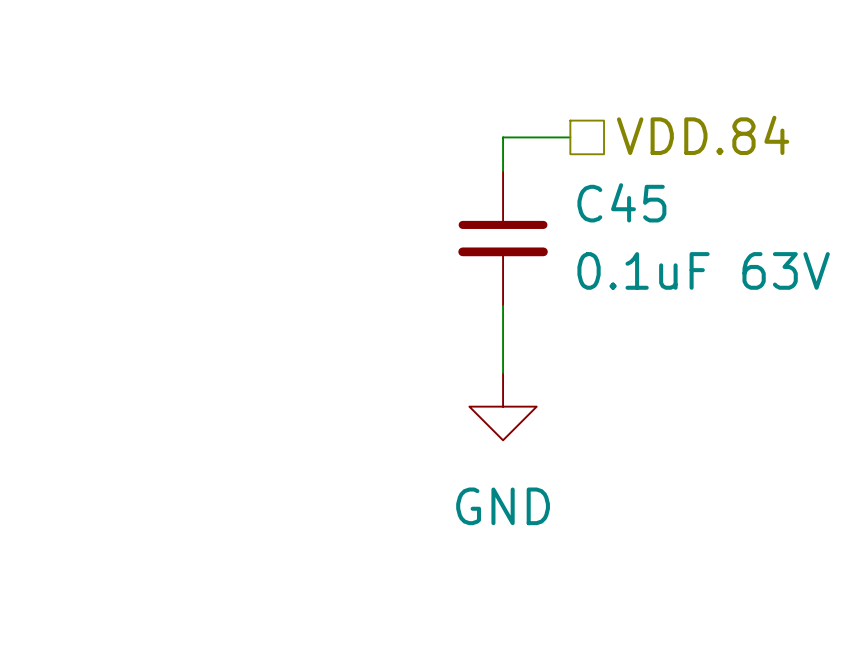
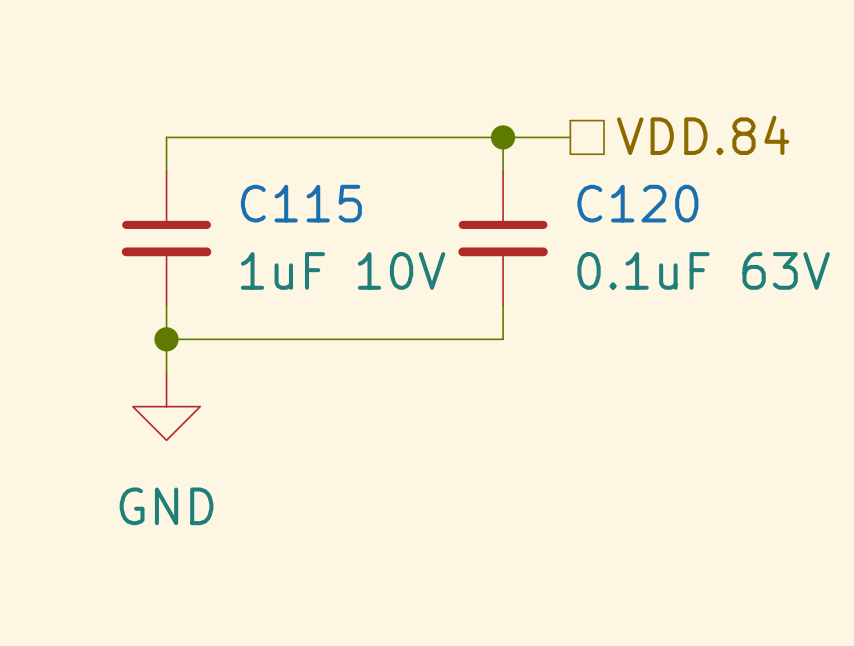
wire: none -> (503, 137) (166, 137) (166, 171)
junction: none -> (503, 137)
C45 name: C45 (621, 202) -> C120 (637, 203)
C115: none -> 1uF 10V (166, 238)
wire: none -> (166, 305) (166, 372)
junction: none -> (166, 339)
wire: (503, 339) (503, 372) -> (503, 339) (166, 339)
power symbol position: GND (503, 406) -> GND (166, 406)

